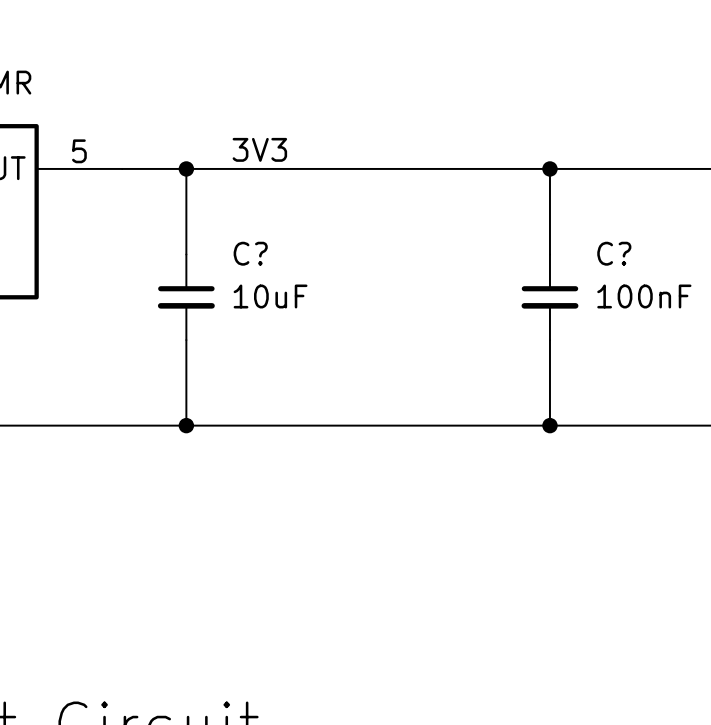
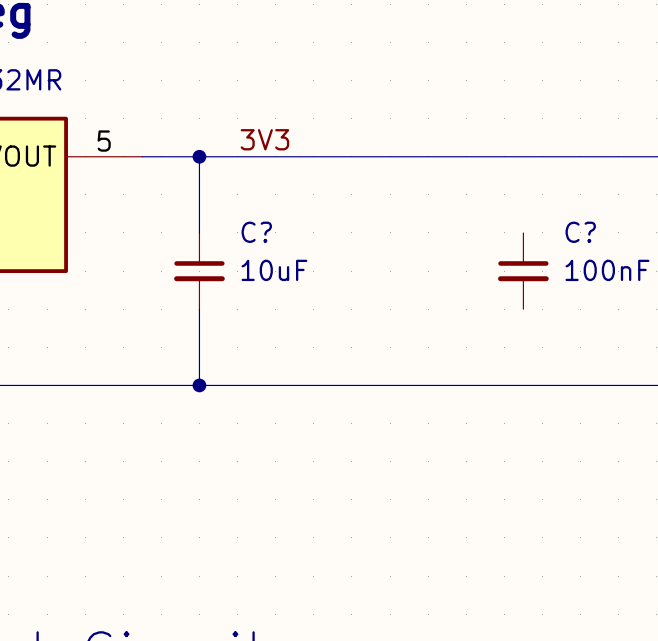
wire: (549, 168) (549, 254) -> none
junction: (549, 168) -> none
wire: (549, 340) (549, 425) -> none
junction: (549, 425) -> none

